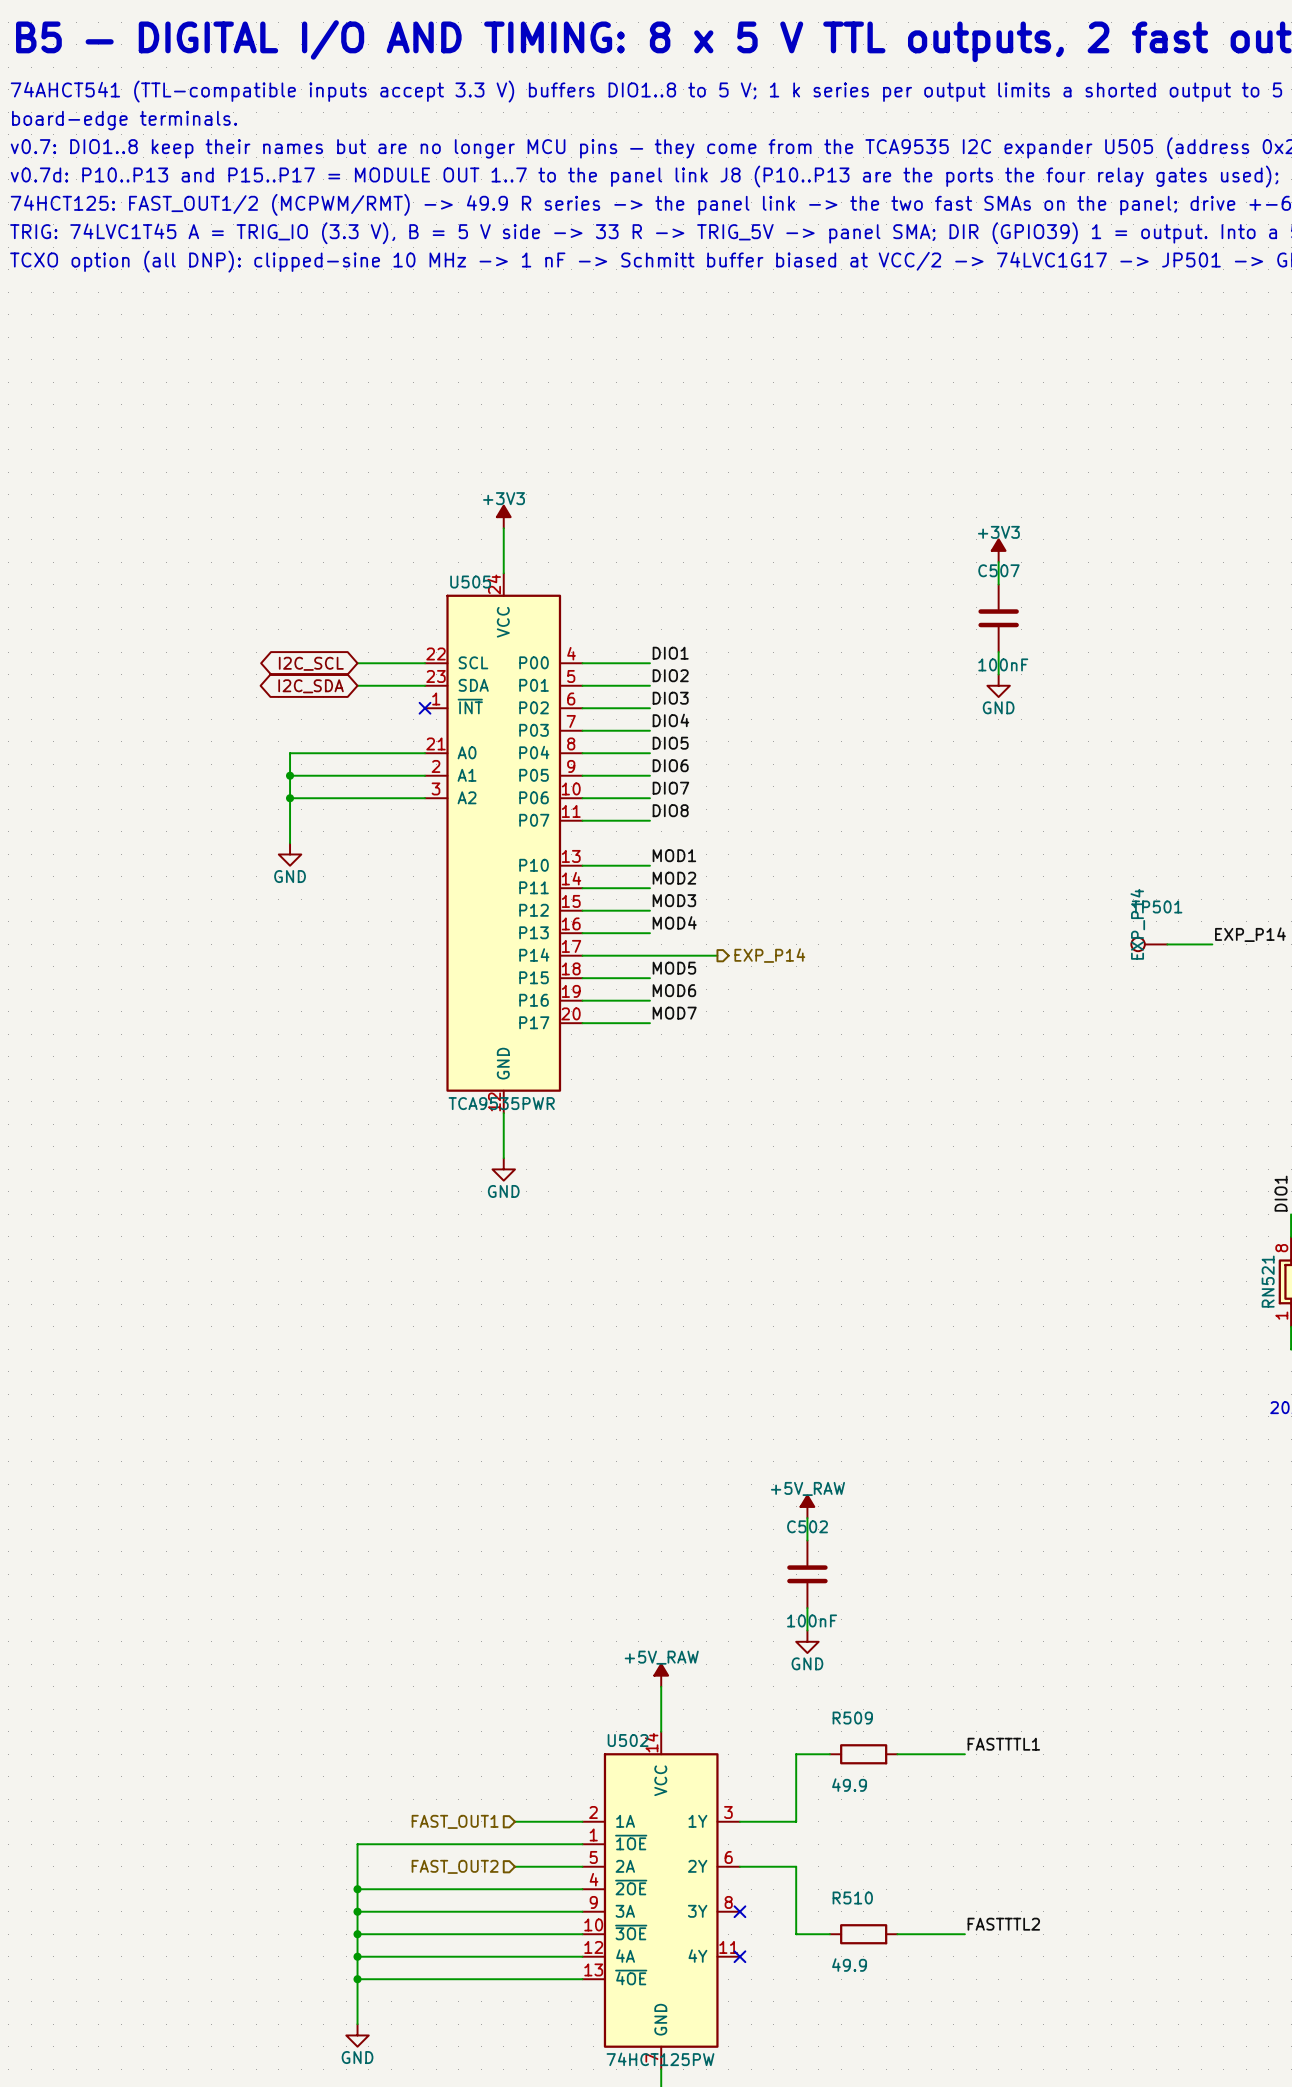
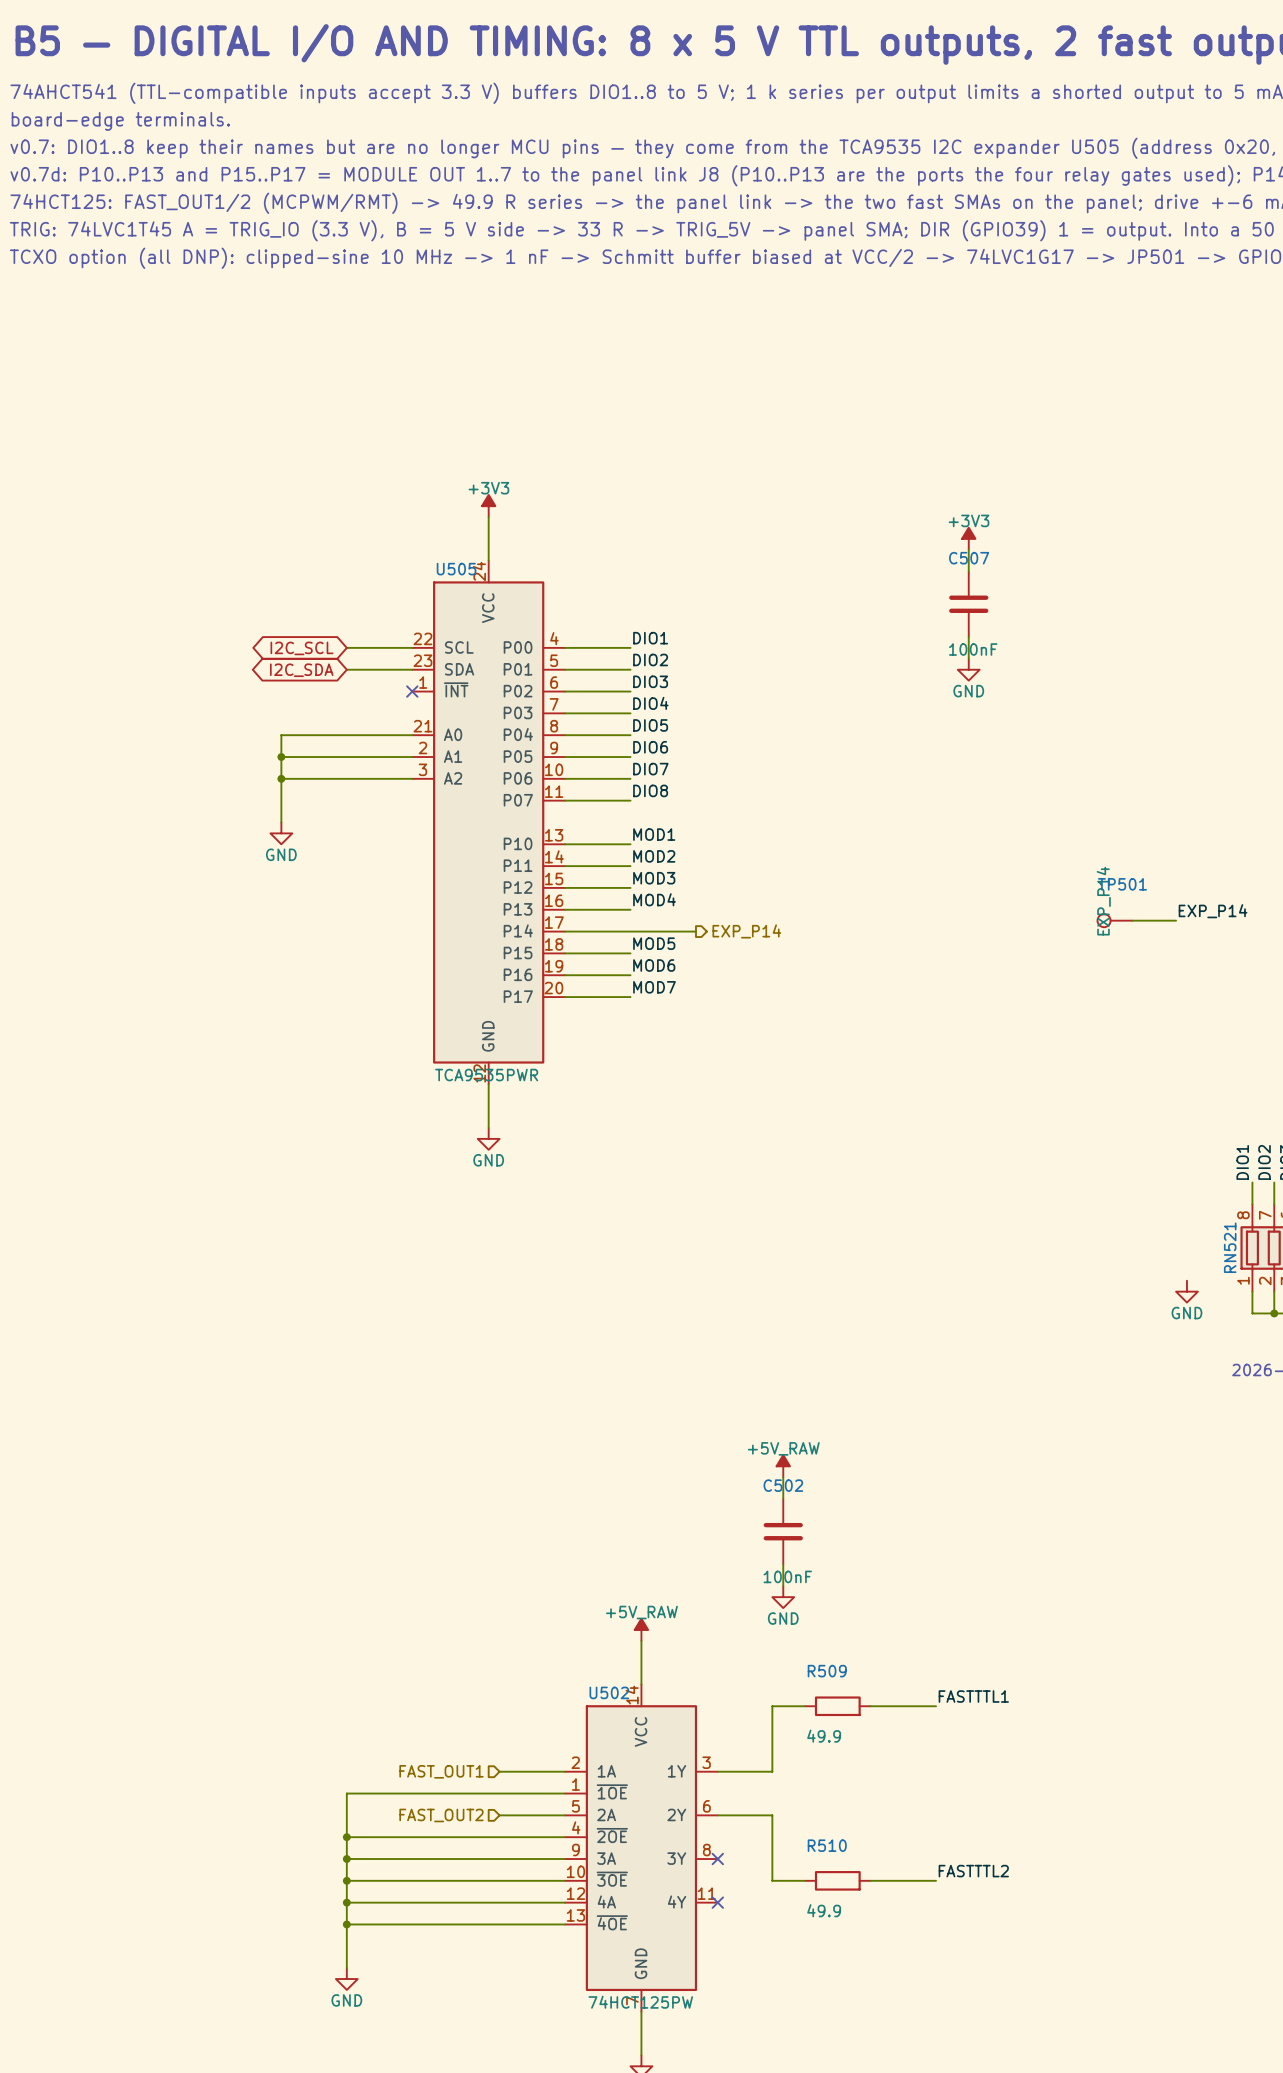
power symbol: none -> GND (1186, 1291)

